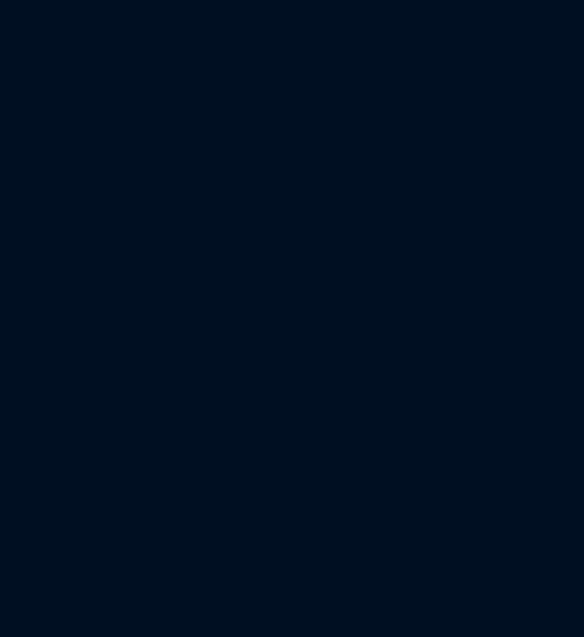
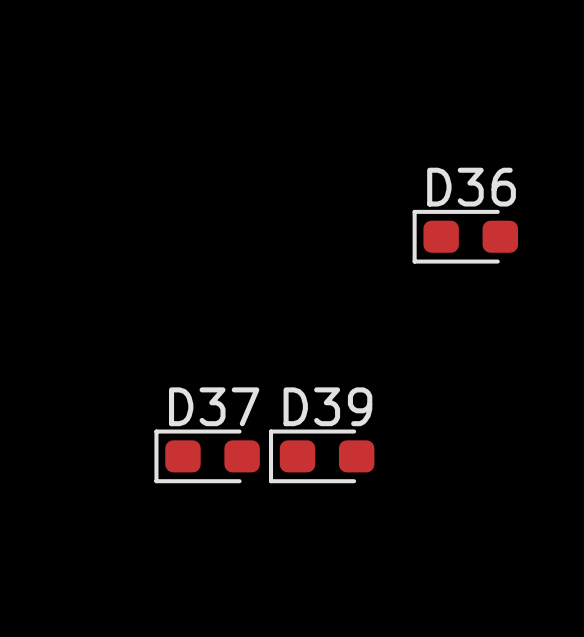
D36: none -> (465, 236)
D37: none -> (207, 456)
D39: none -> (321, 456)

